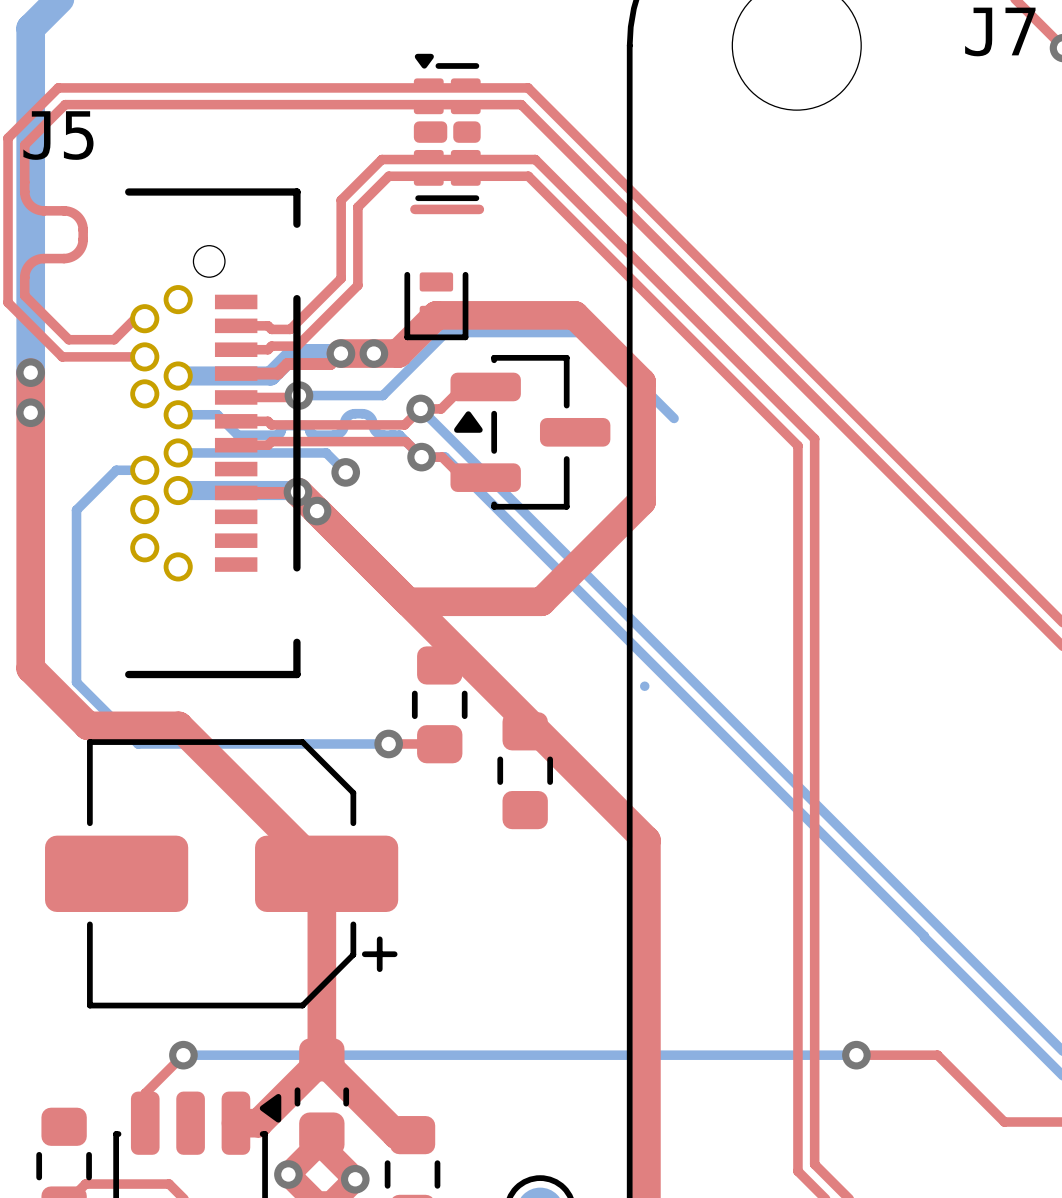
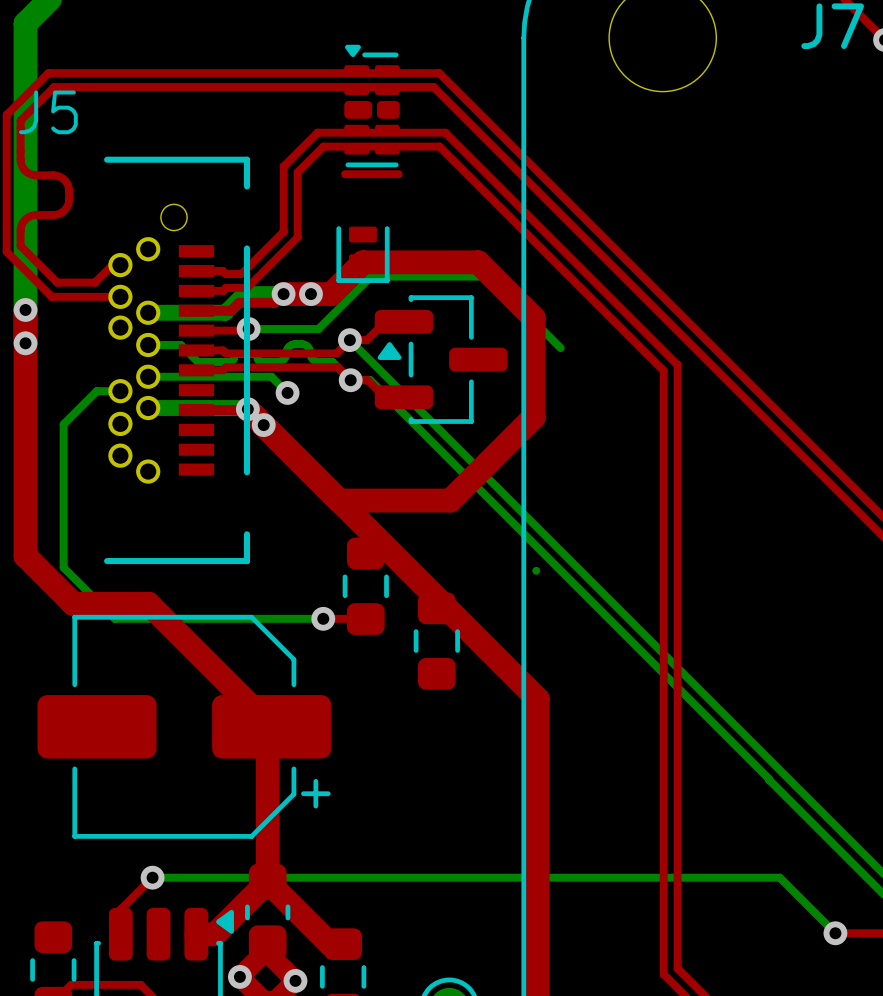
top track: (856, 1055) (937, 1055) (1004, 1122) -> none
bottom track: none -> (712, 877) (779, 877) (835, 933)
via position: (856, 1055) -> (835, 933)

